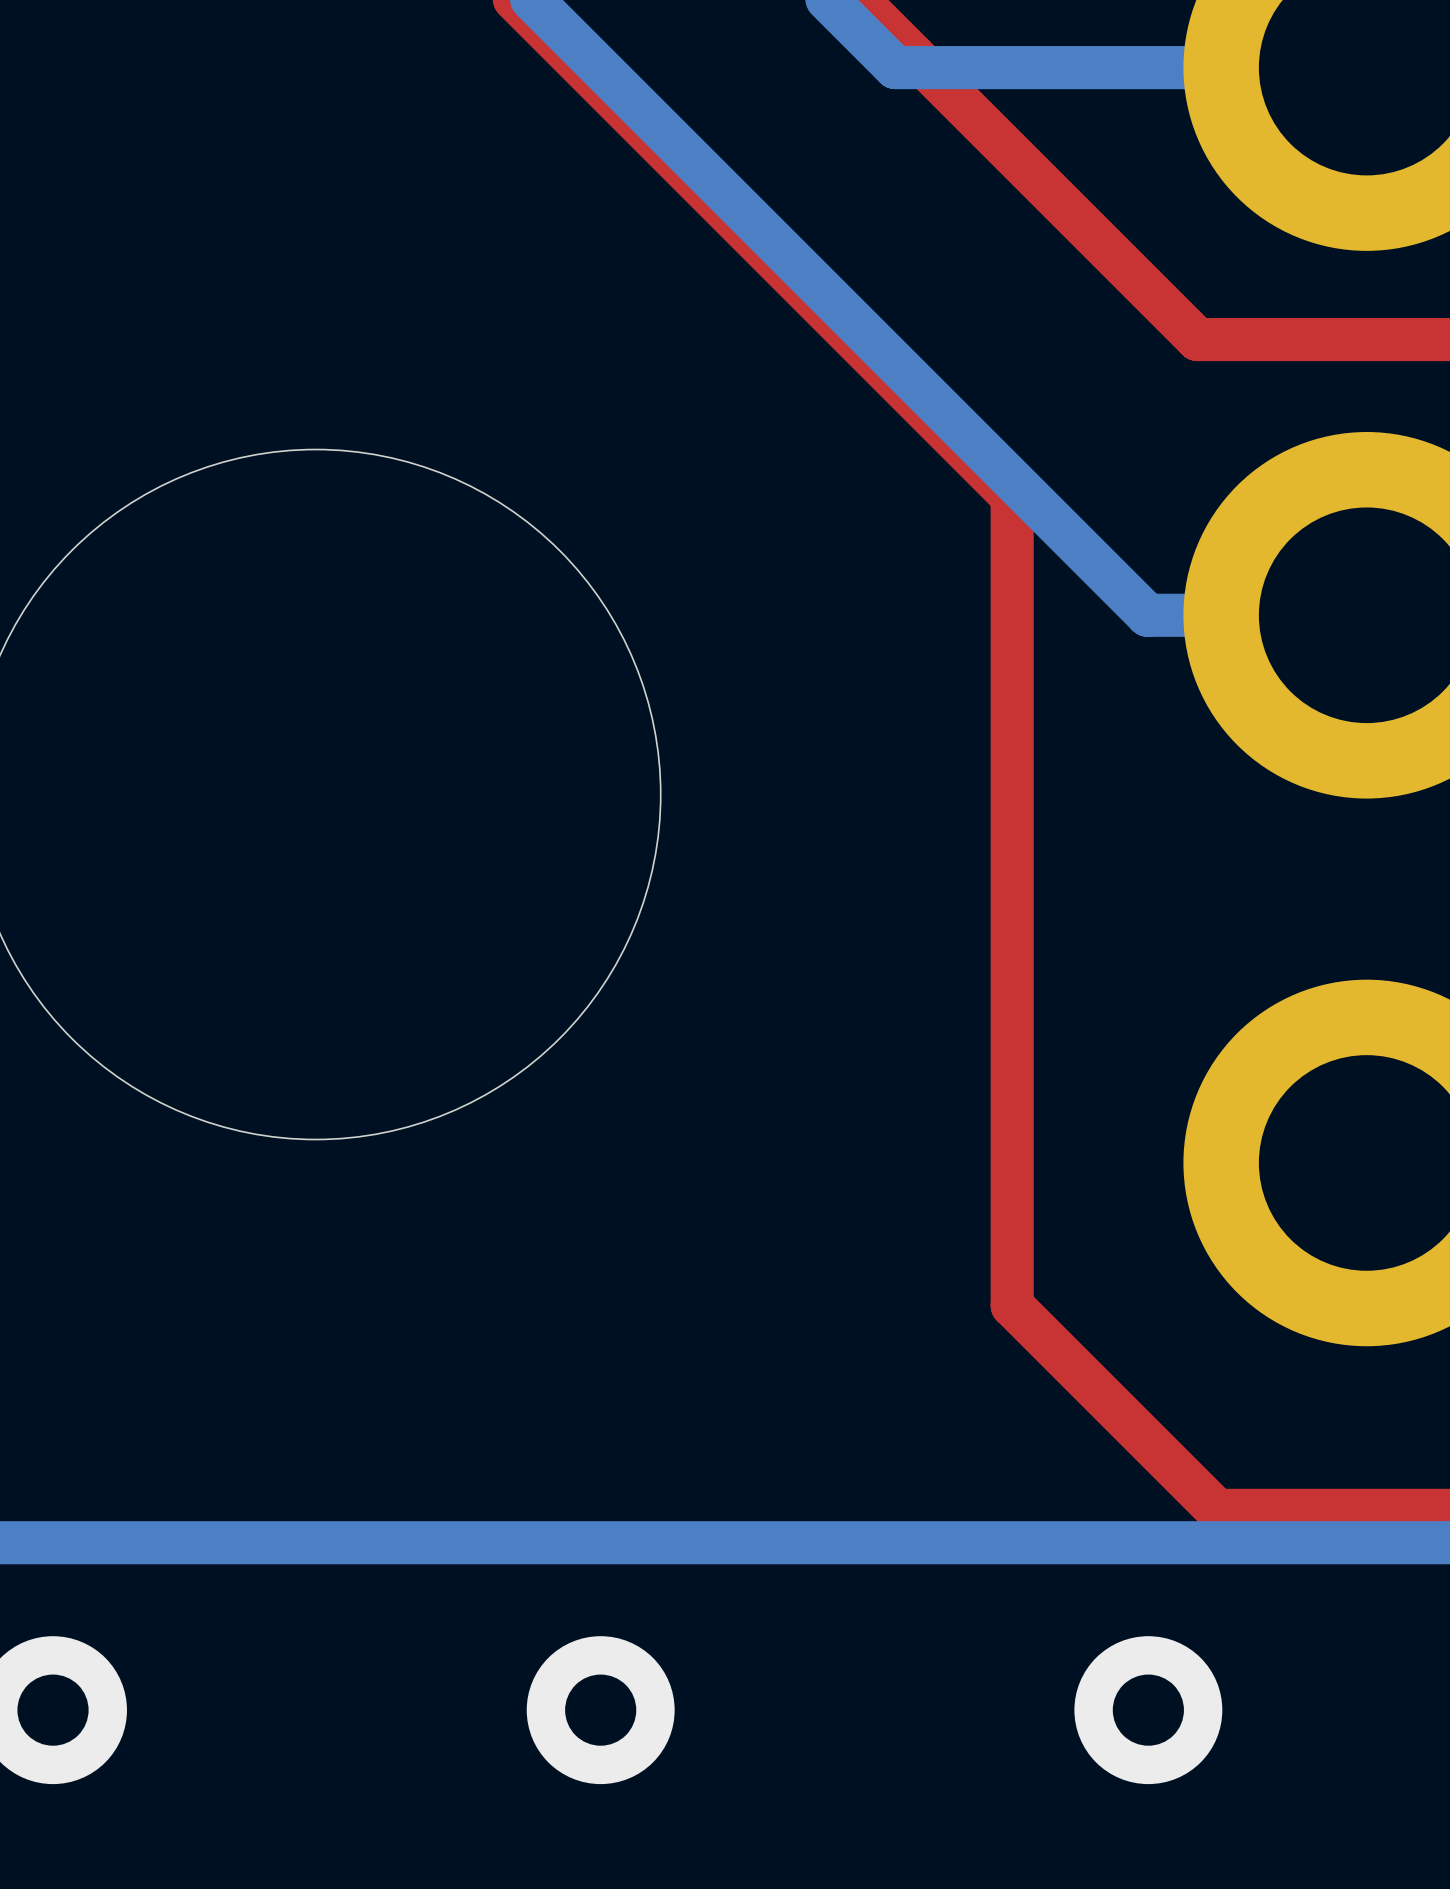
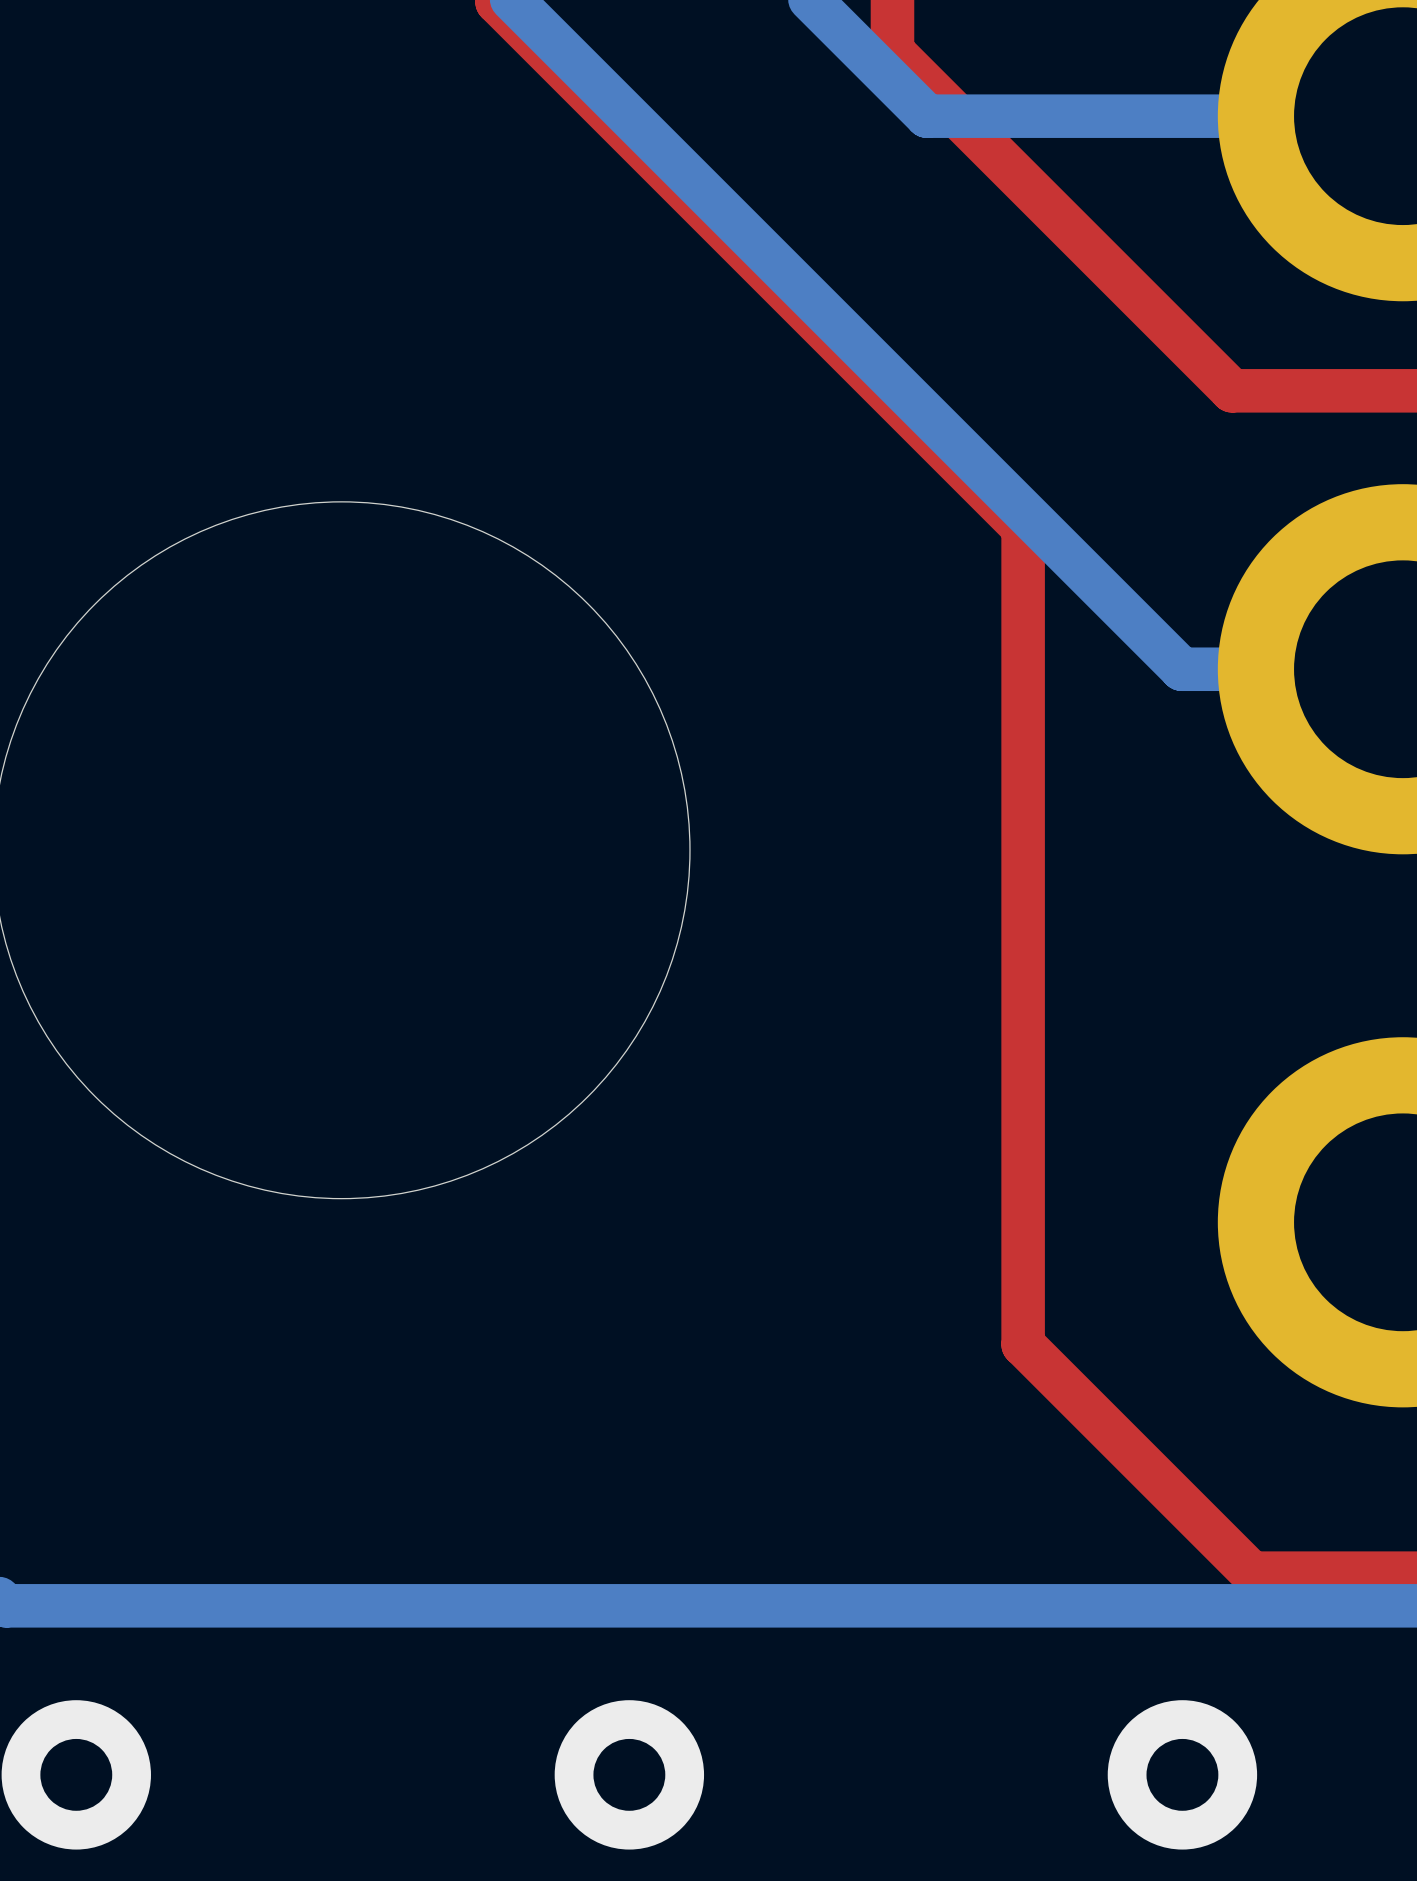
top track: (990, 475) (1012, 496) (1012, 1305) -> (1023, 527) (1023, 1344) (1044, 1366)

